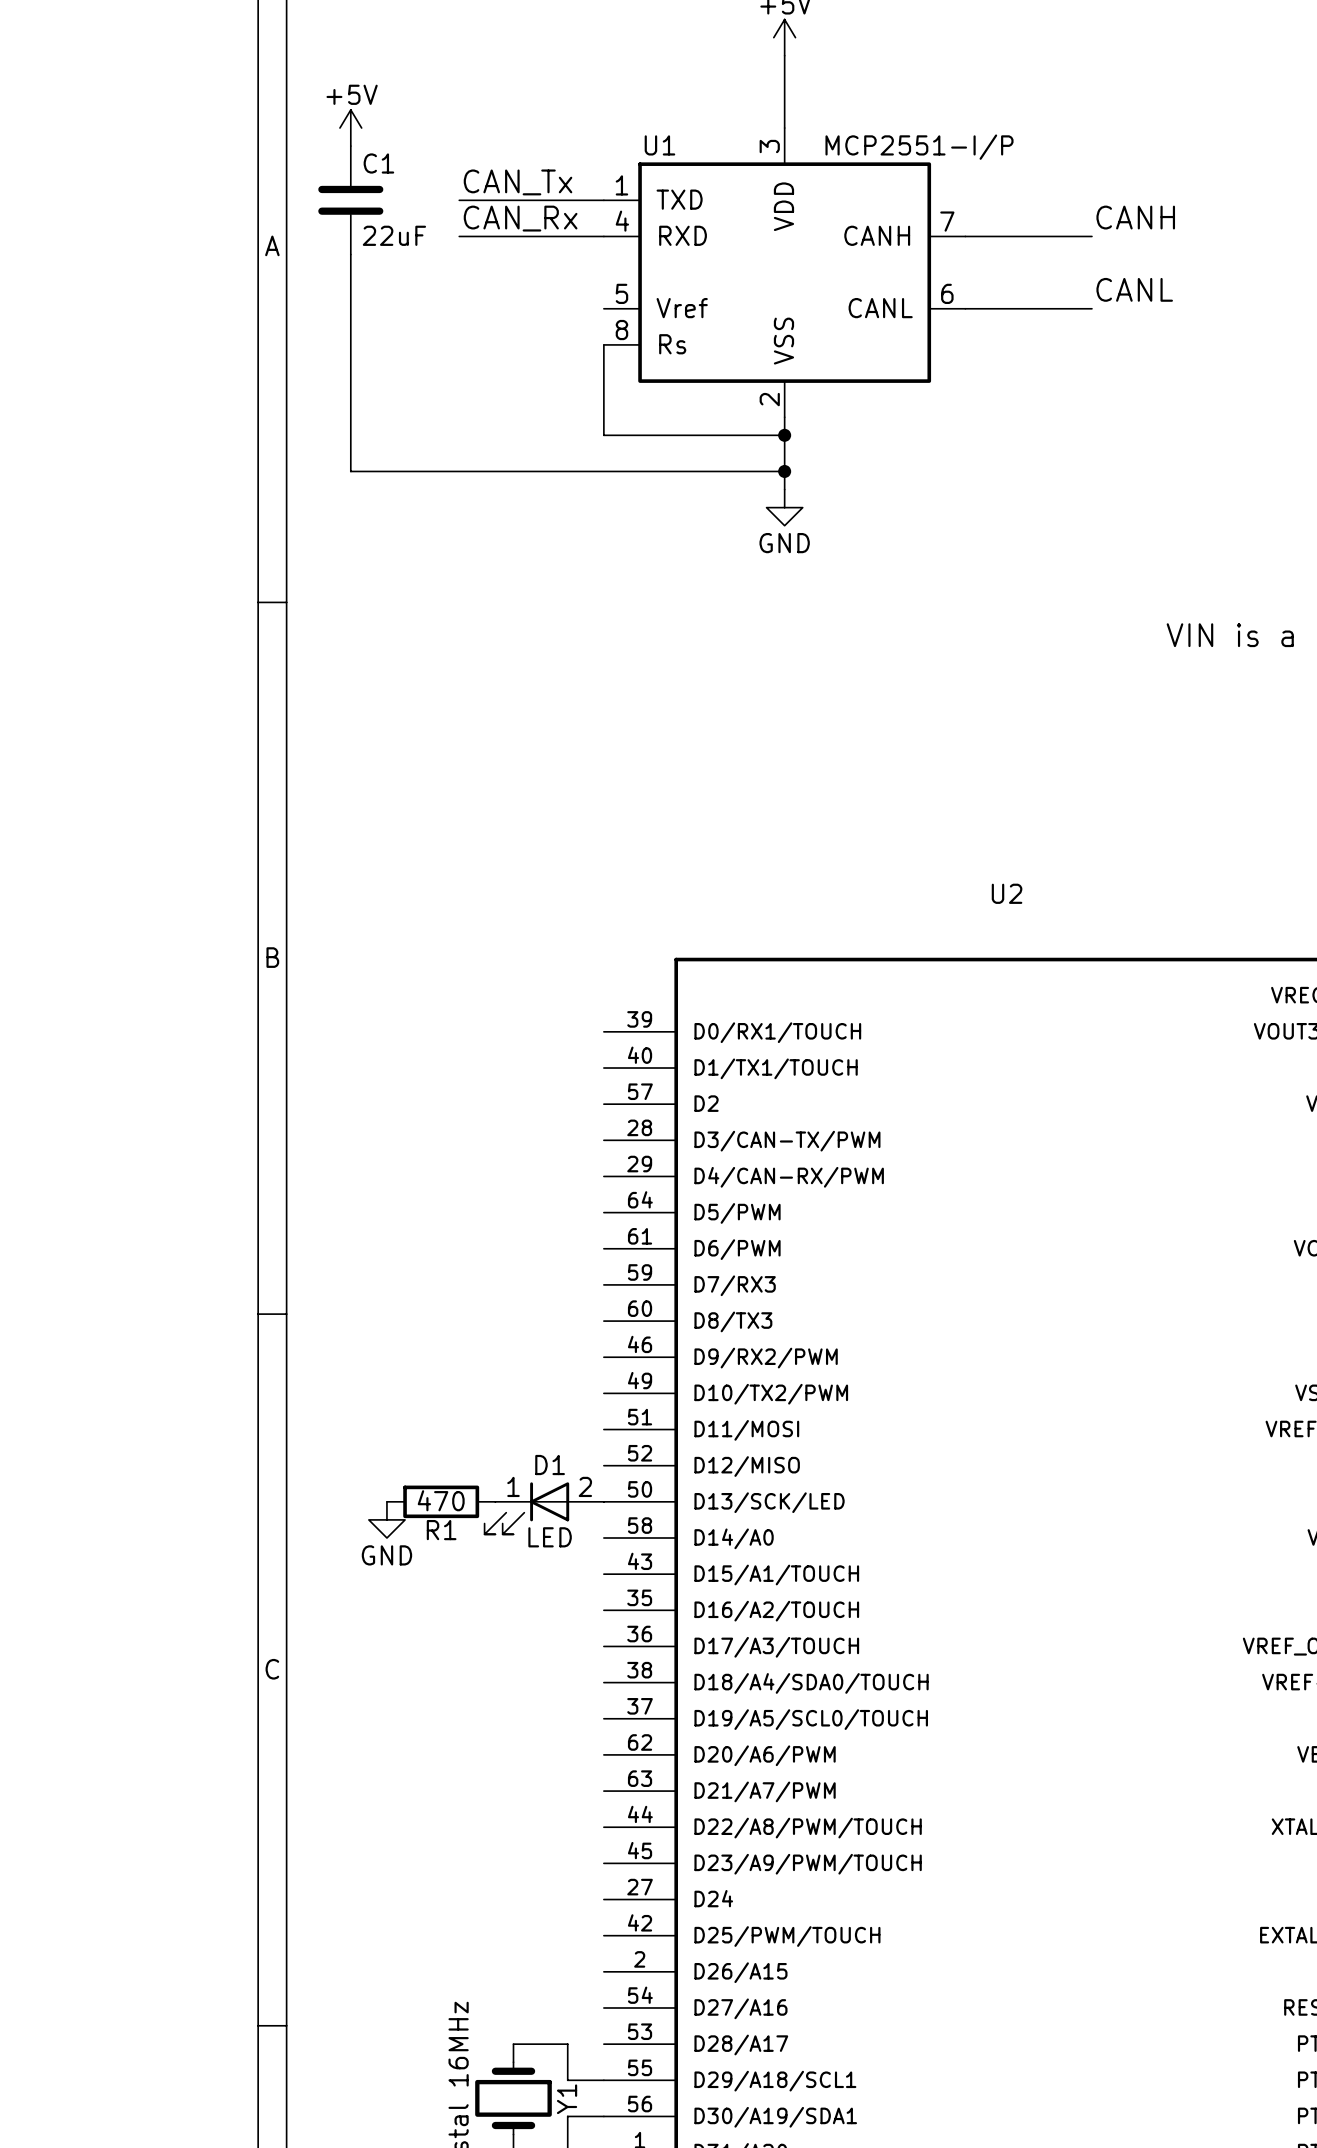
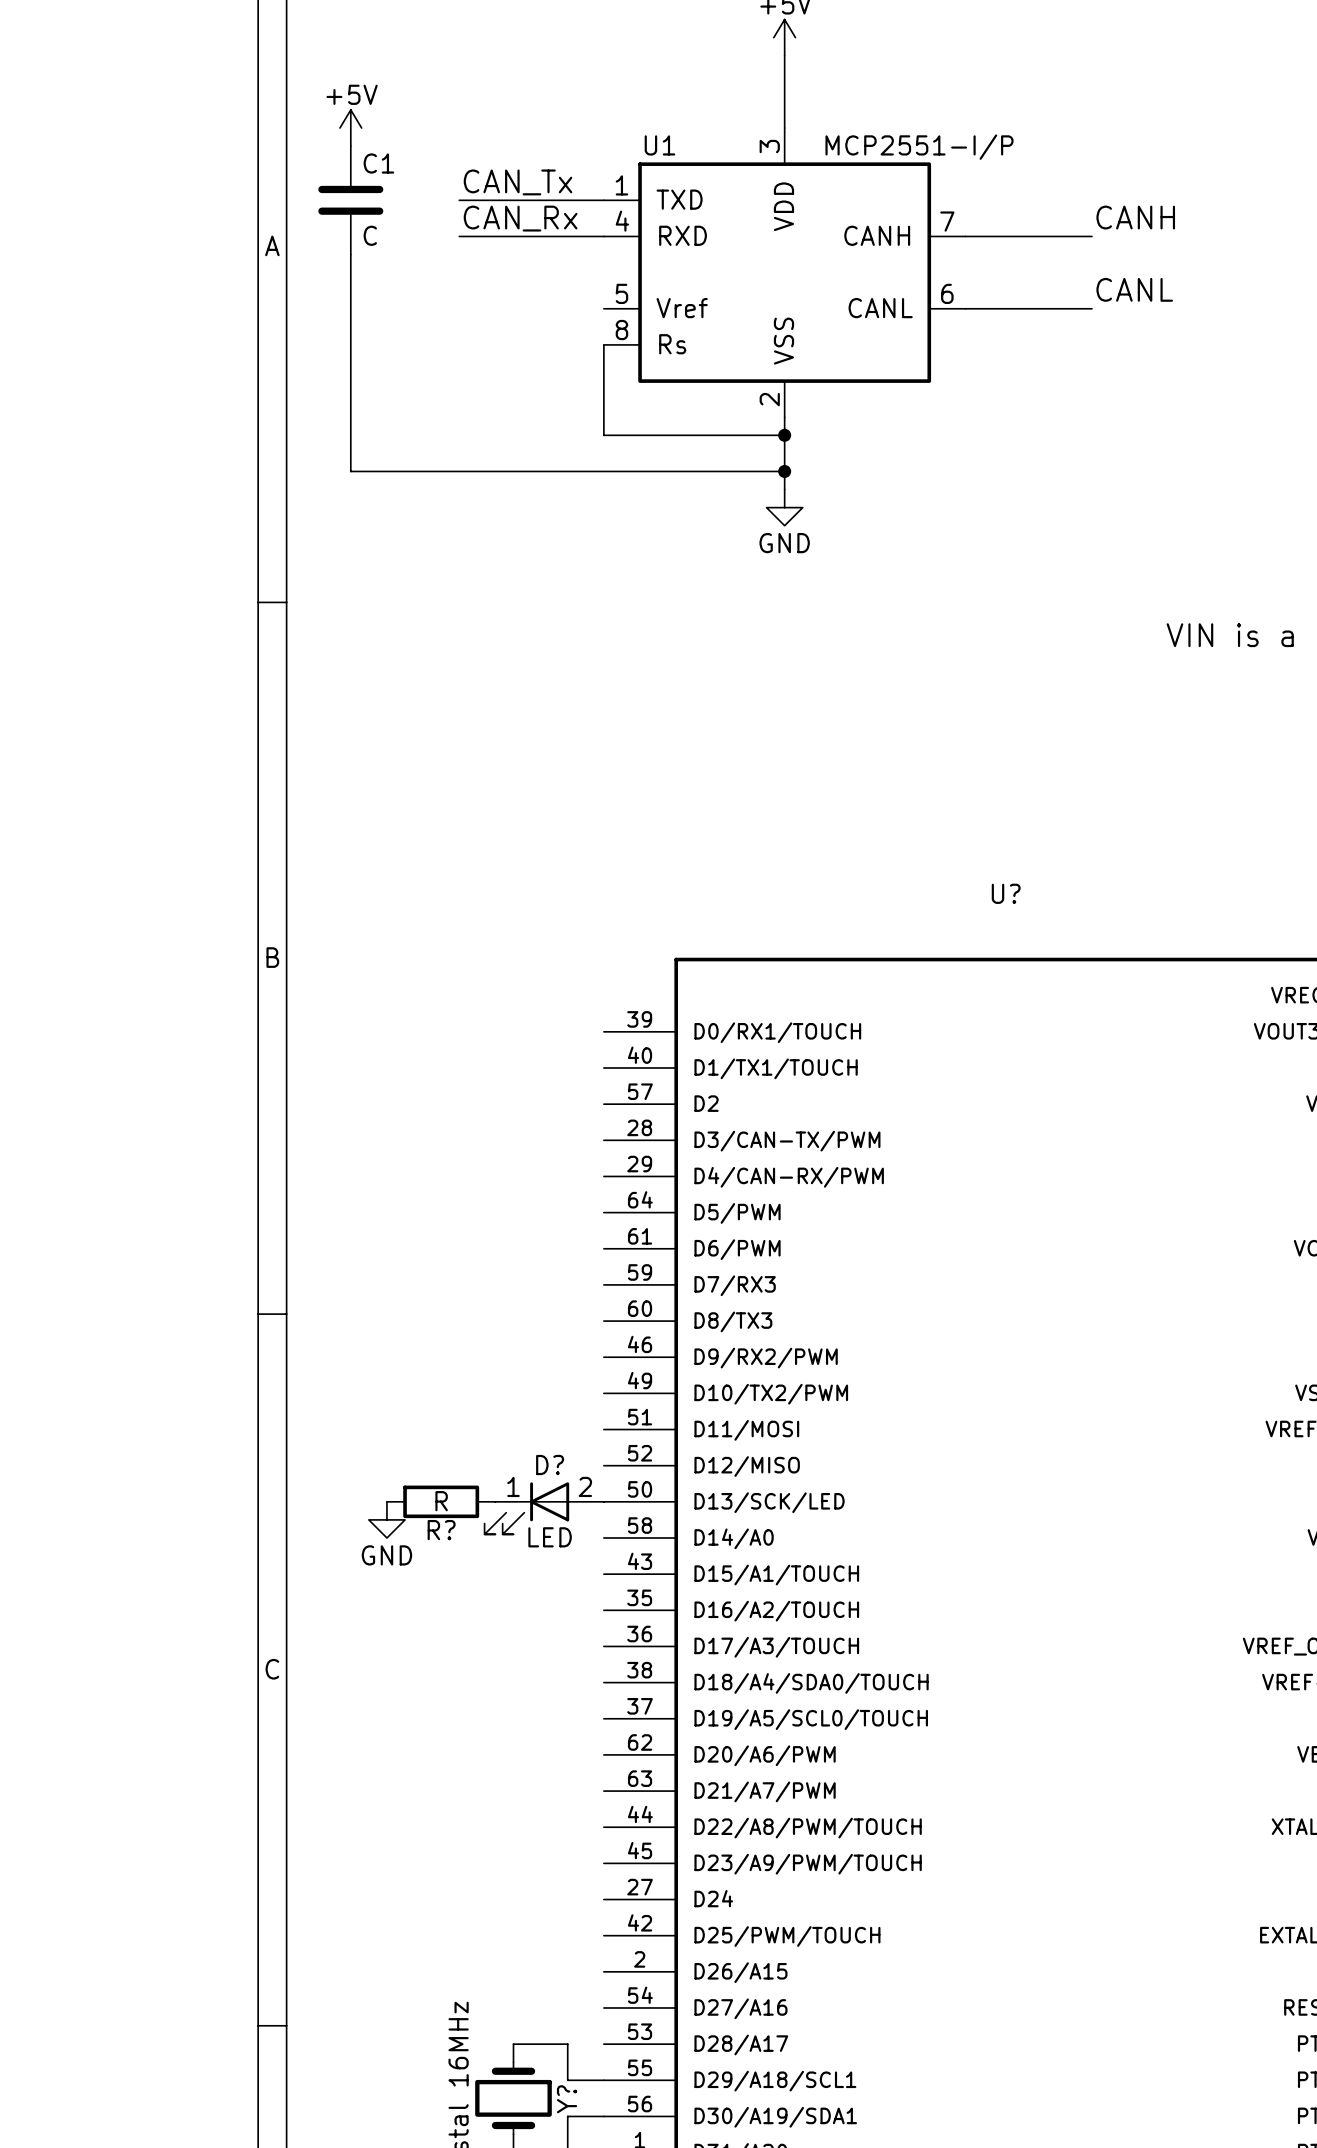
C1 value: 22uF (394, 235) -> C (370, 235)
U2 name: U2 (1007, 893) -> U? (1006, 893)
D1 name: D1 (550, 1465) -> D? (550, 1465)
R1 value: 470 (441, 1500) -> R (441, 1501)
R1 name: R1 (441, 1530) -> R? (441, 1530)
Y1 name: Y1 (567, 2099) -> Y? (567, 2099)

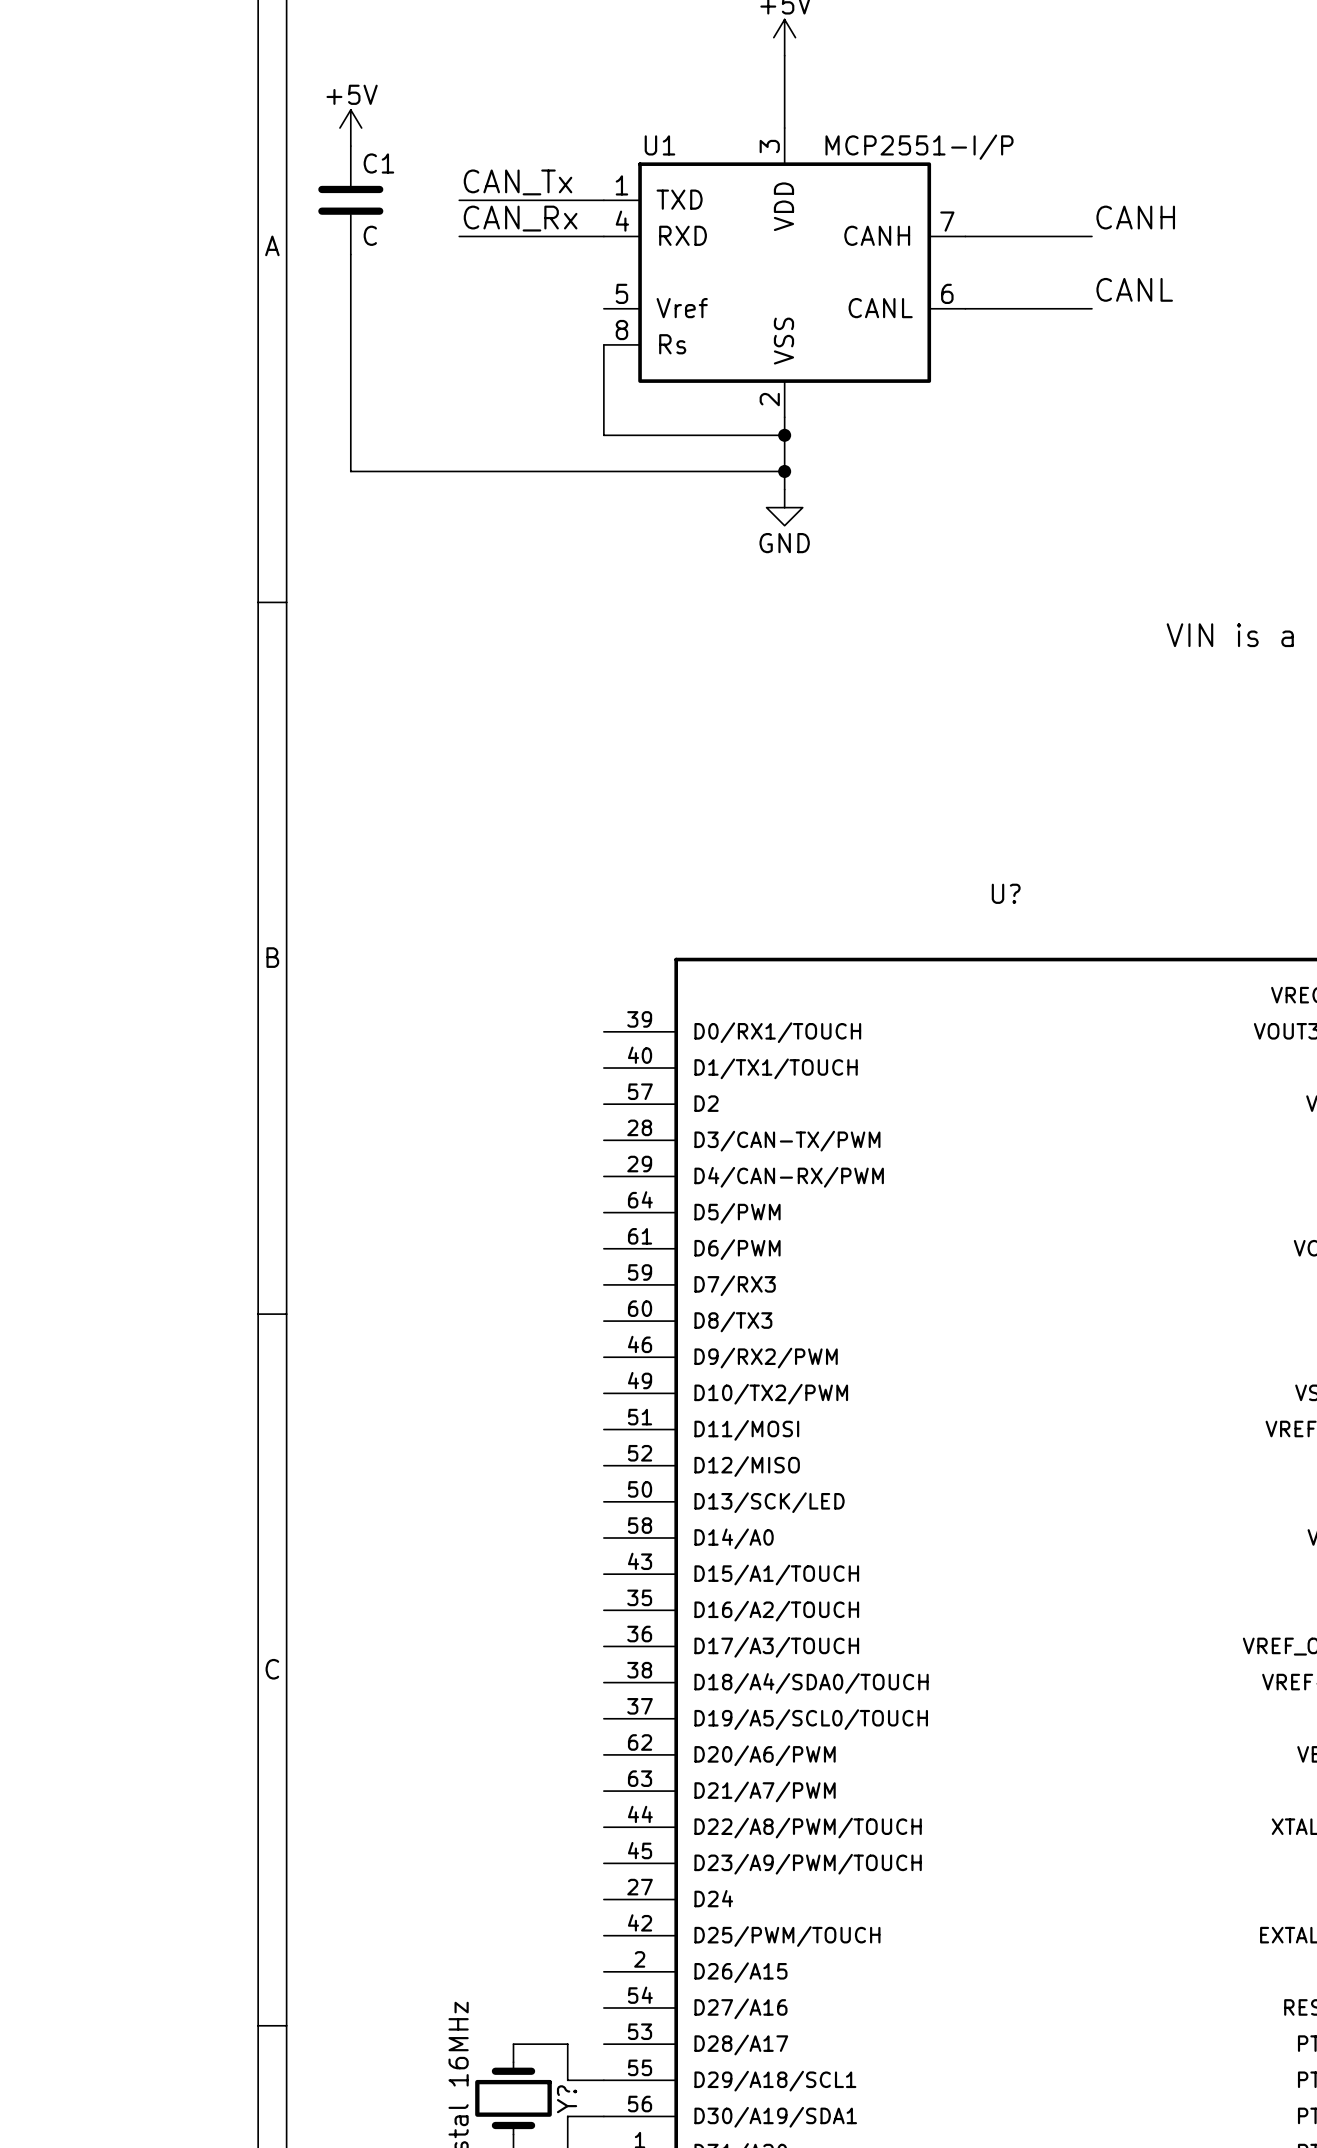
R?: R (441, 1501) -> none
D?: LED (544, 1508) -> none
power symbol: GND (386, 1519) -> none

